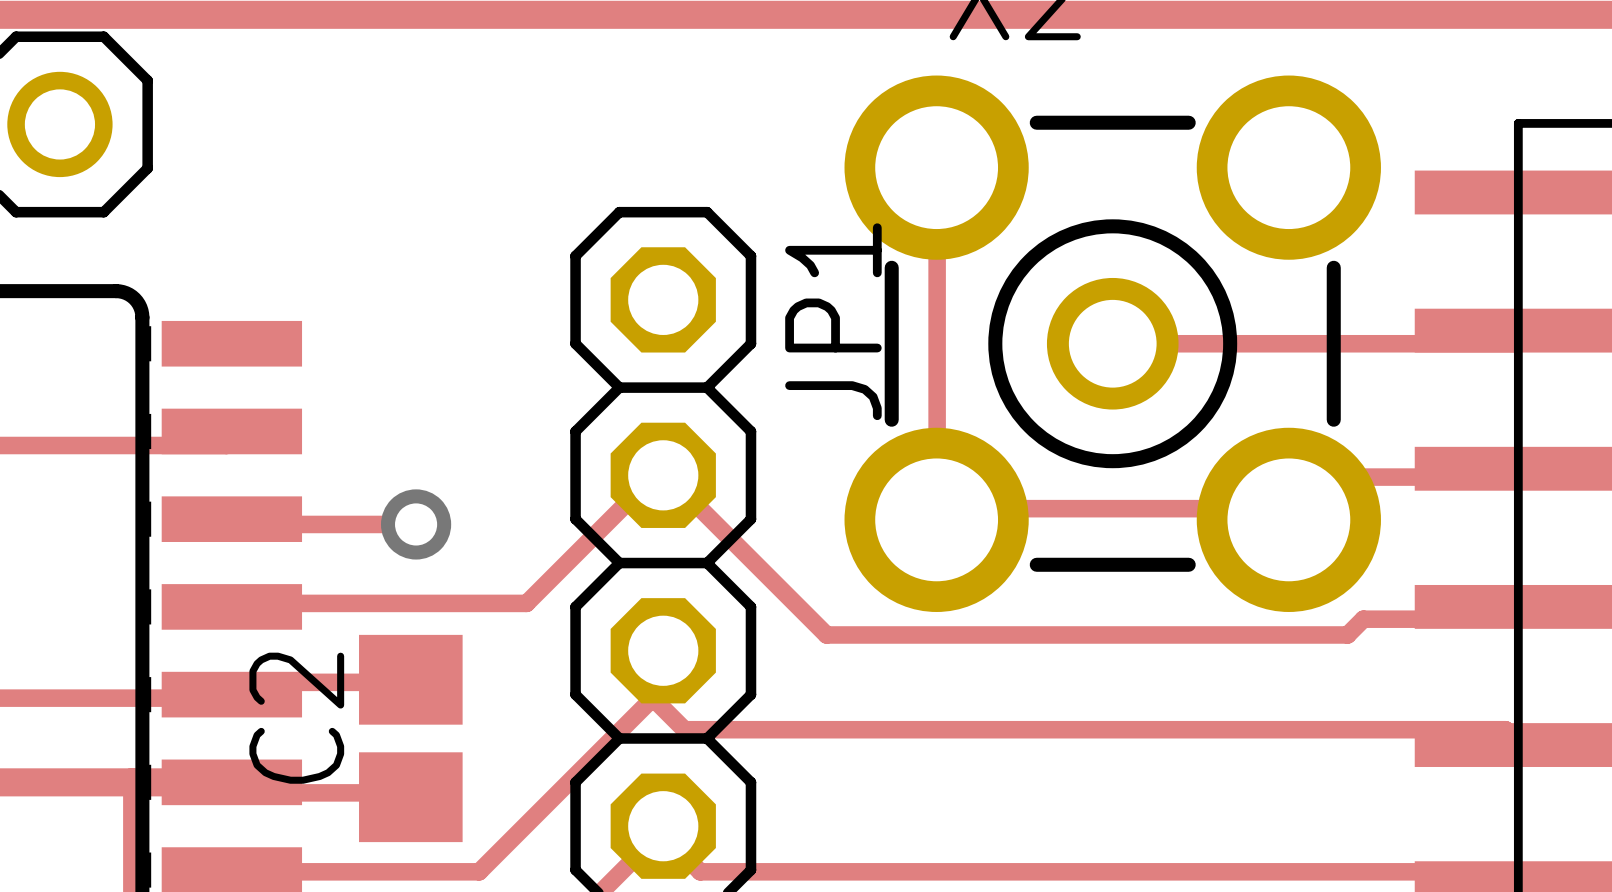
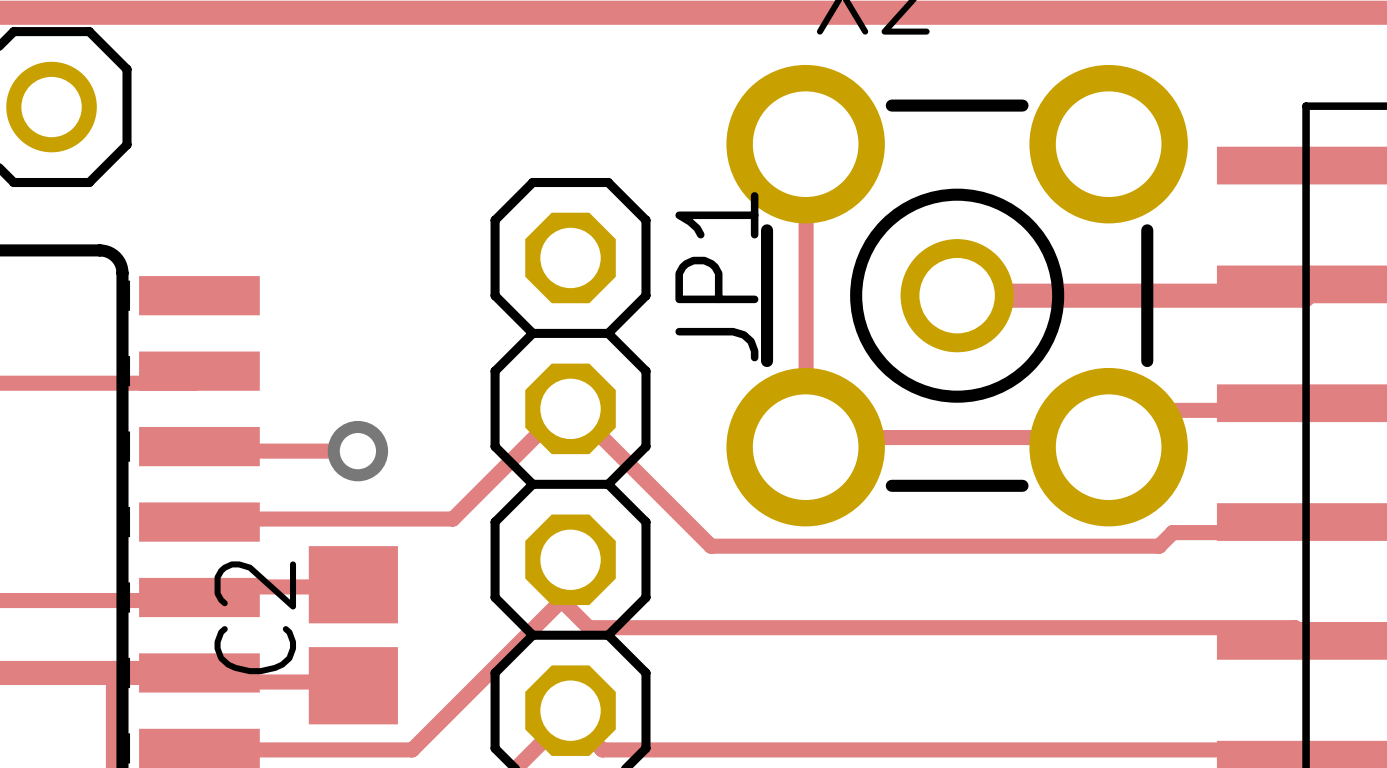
track width: thin (1112, 343) (1516, 343) -> thick (957, 295) (1304, 295)

